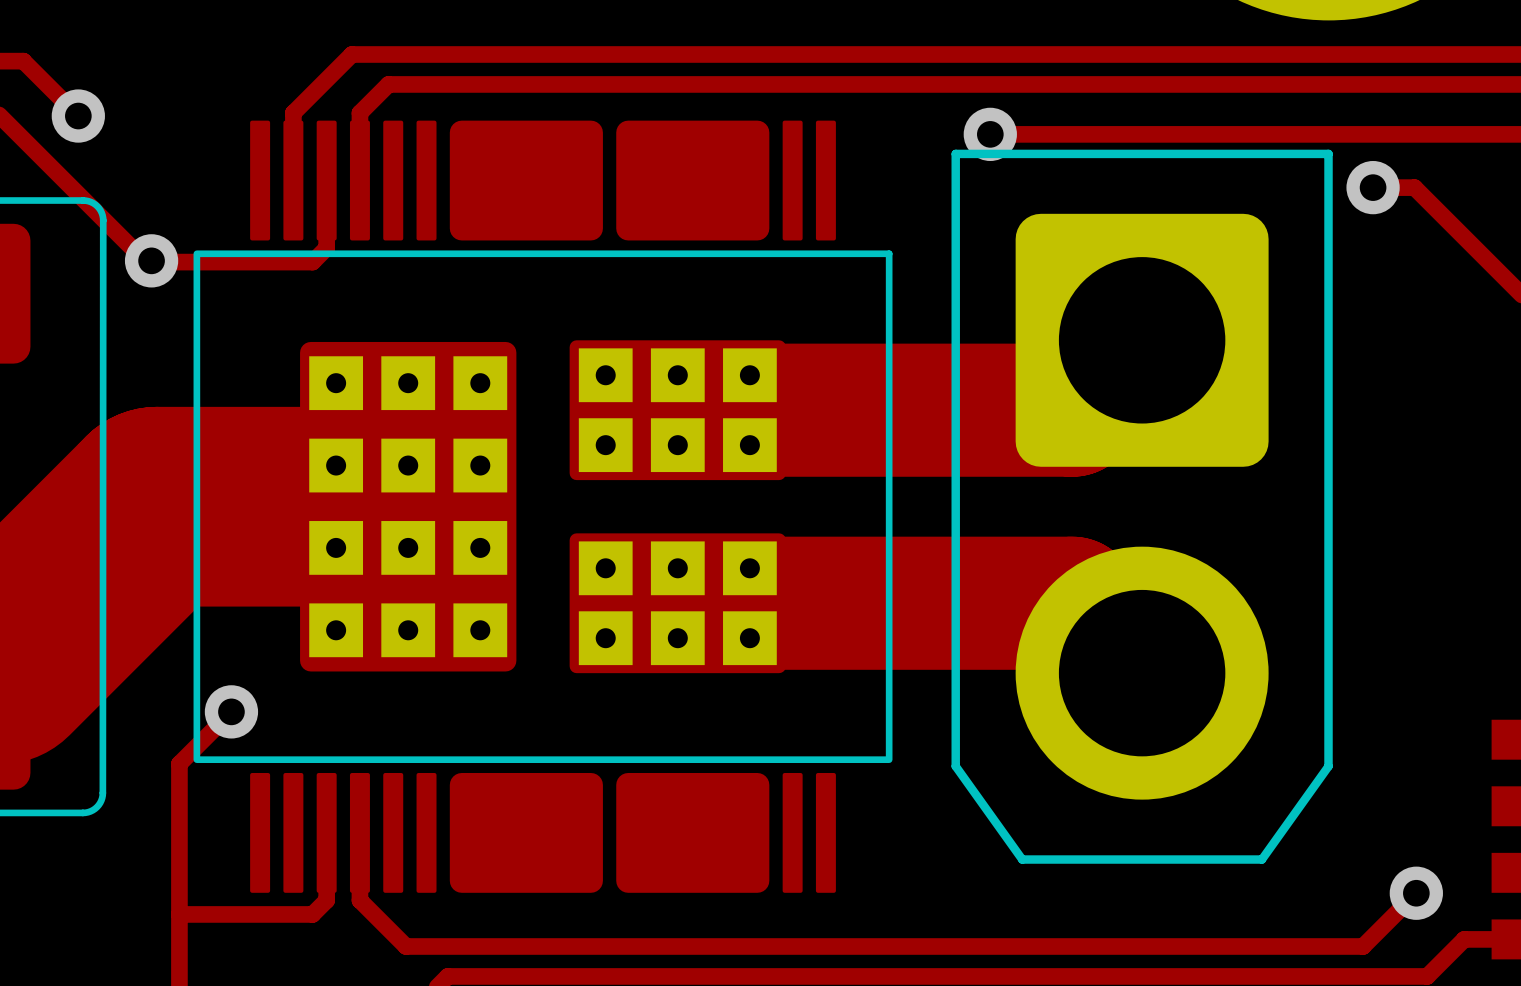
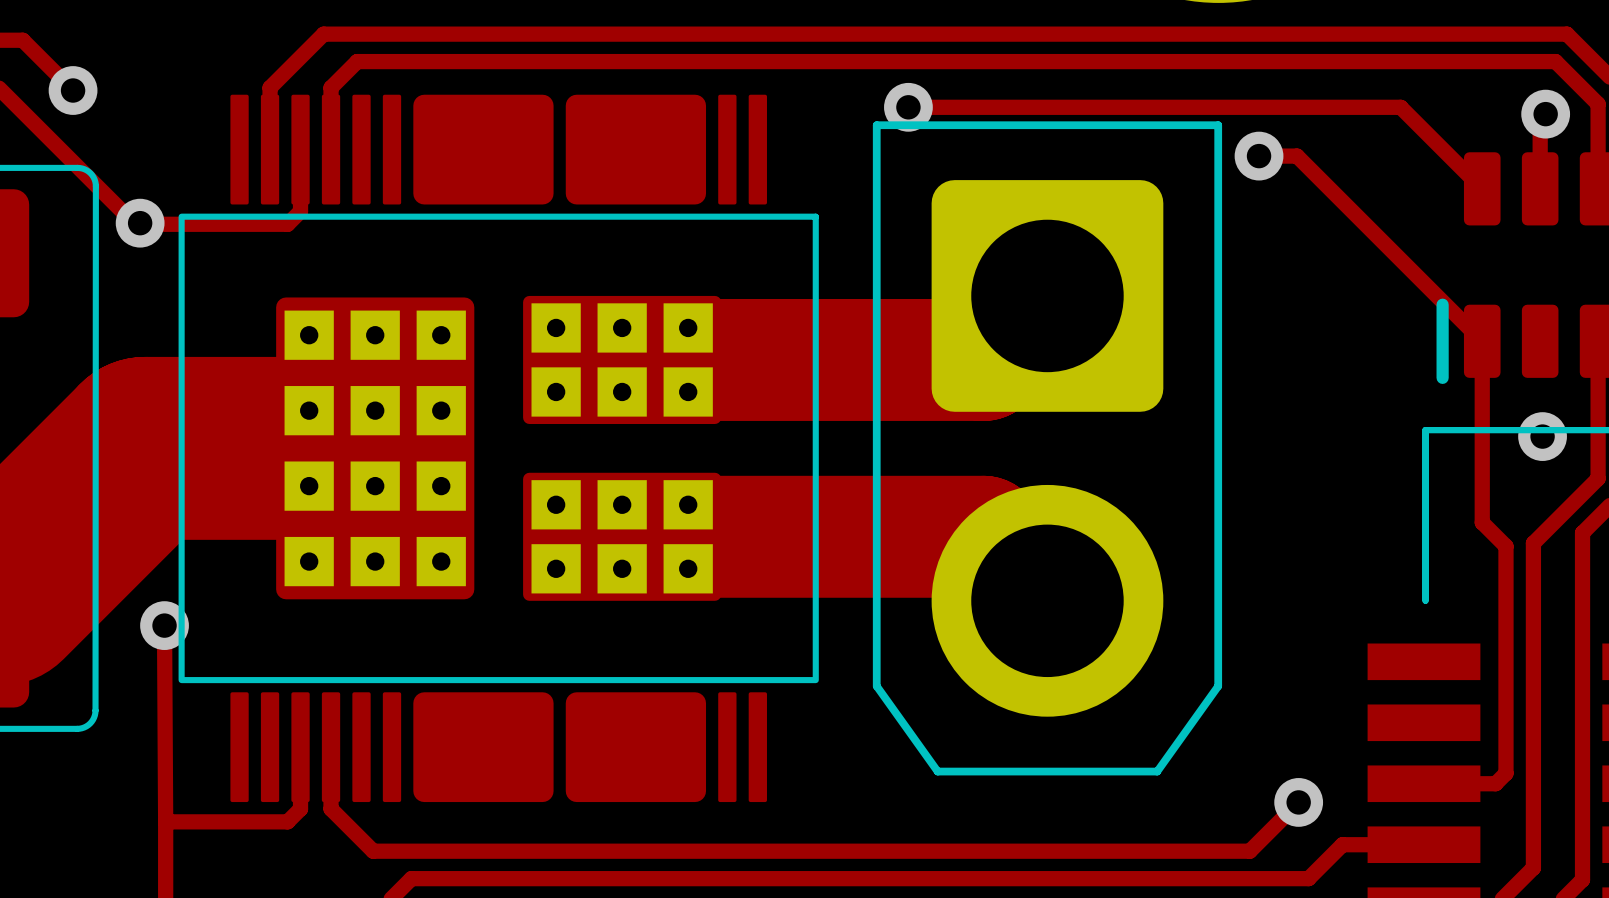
track: (231, 711) (179, 763) (179, 914) -> (164, 625) (165, 821)
via position: (231, 711) -> (164, 625)

